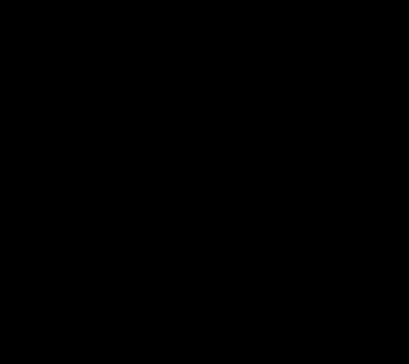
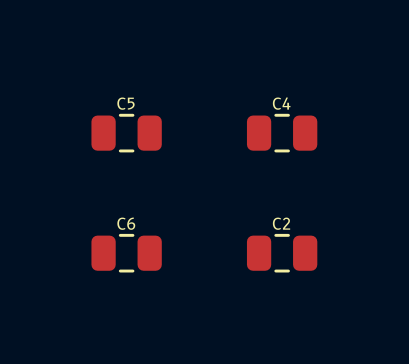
C5: none -> (126, 133)
C4: none -> (282, 133)
C6: none -> (126, 253)
C2: none -> (282, 253)

